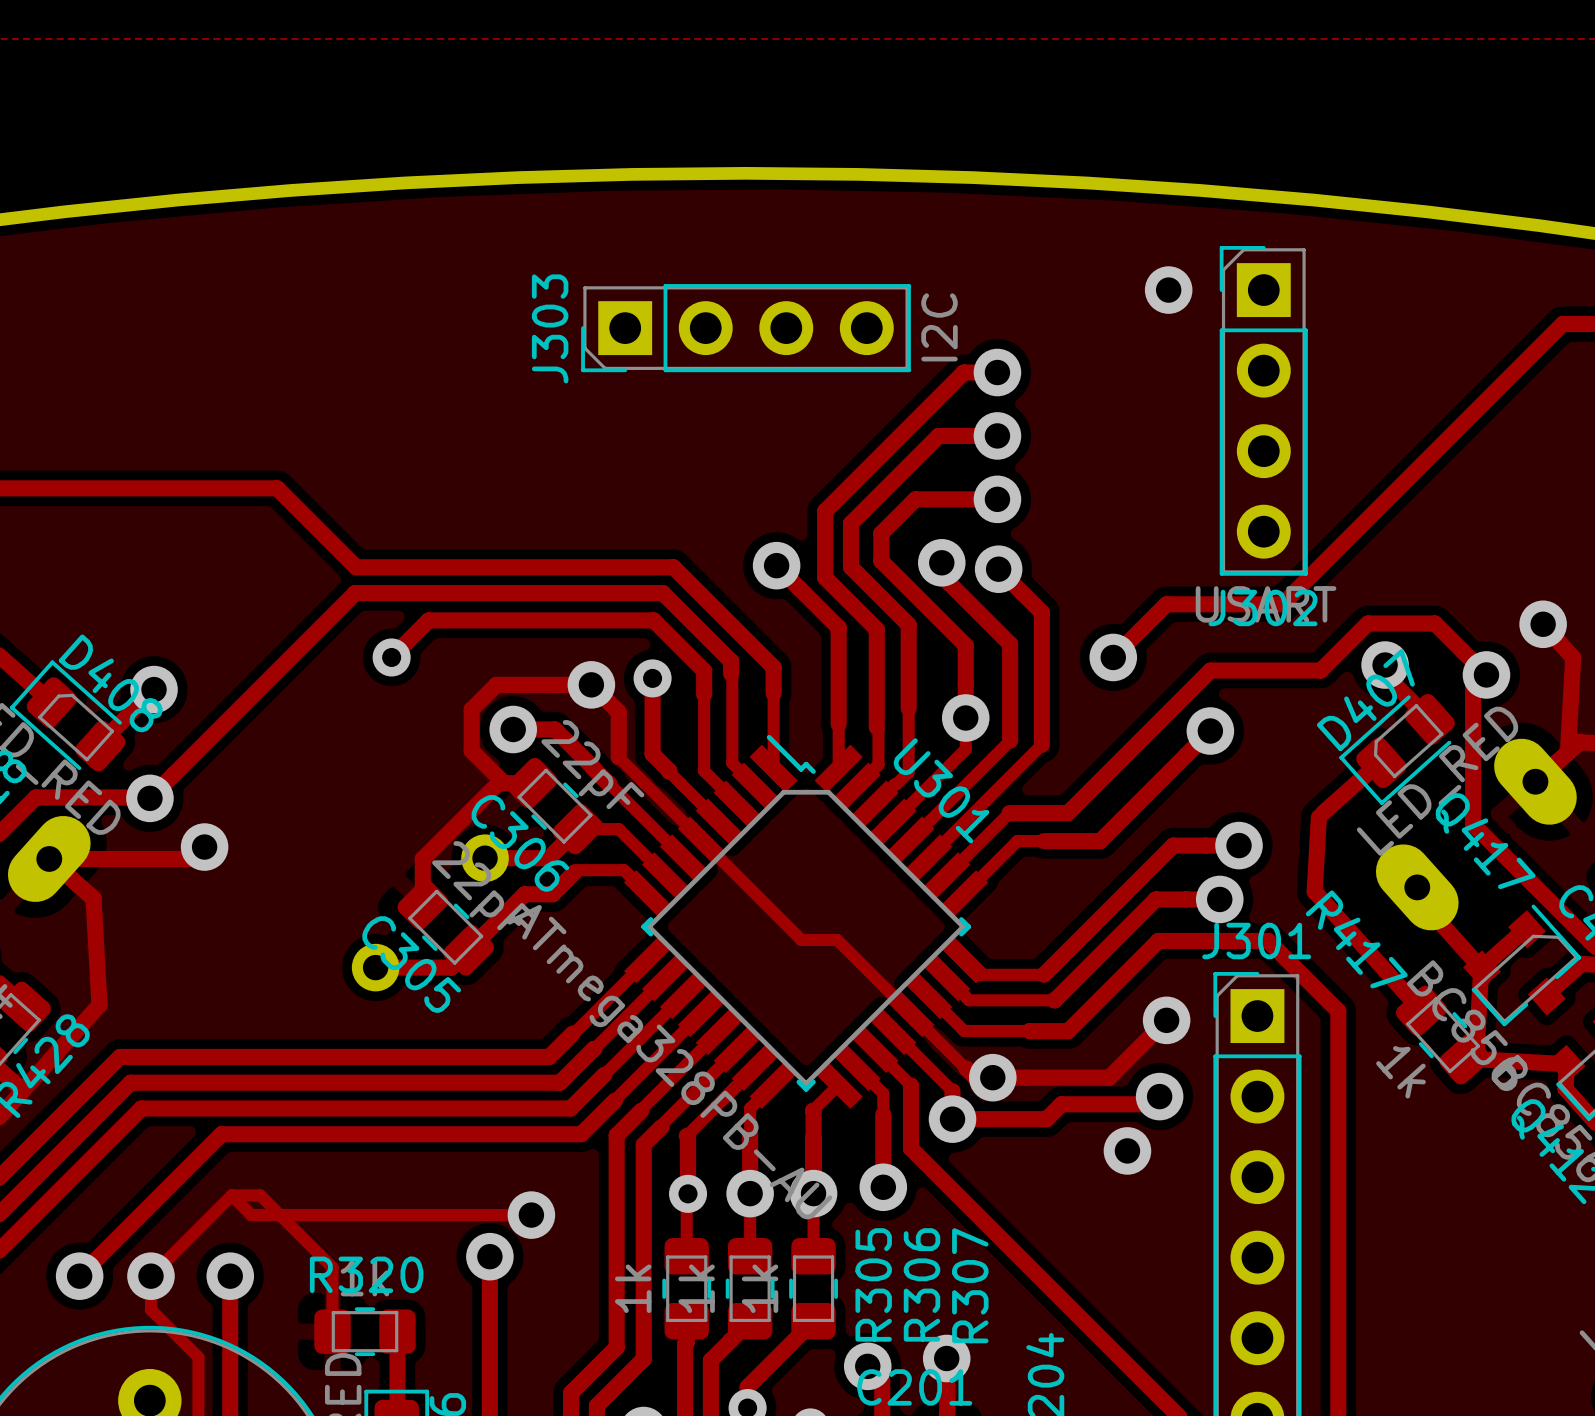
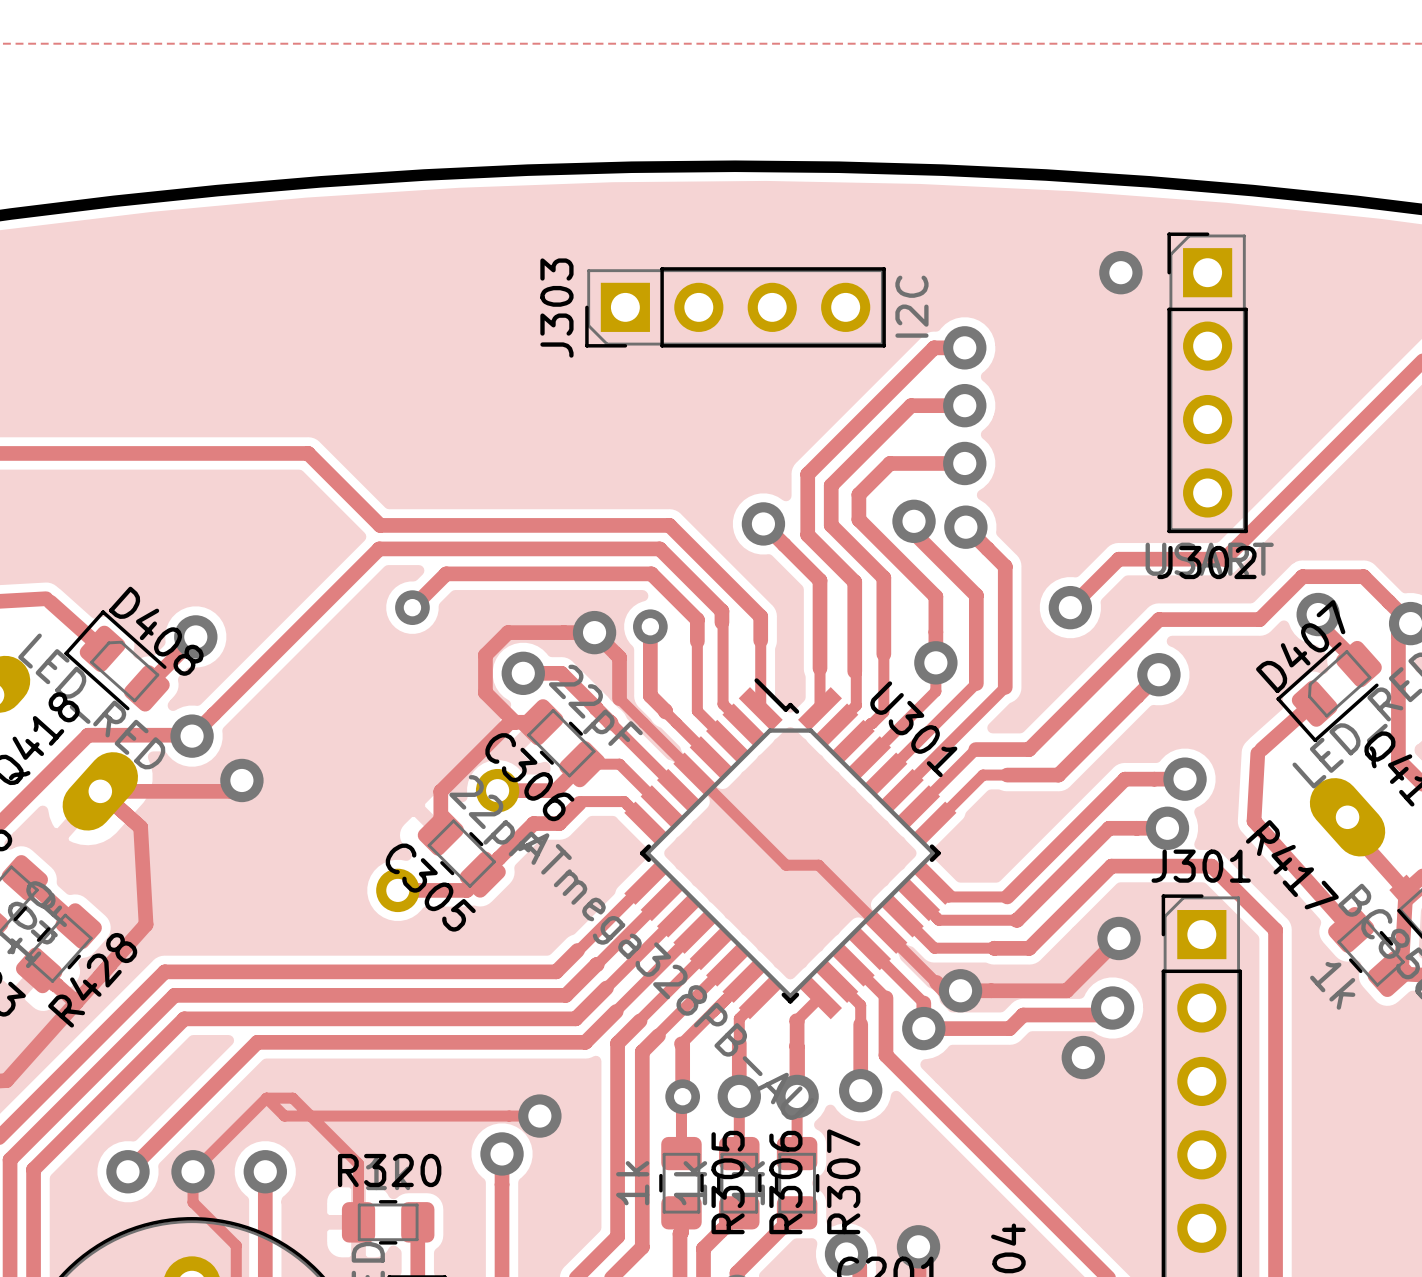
R305 name position: R305 (873, 1284) -> R305 (728, 1182)
R306 name position: R306 (922, 1284) -> R306 (785, 1182)
R307 name position: R307 (970, 1285) -> R307 (843, 1181)

